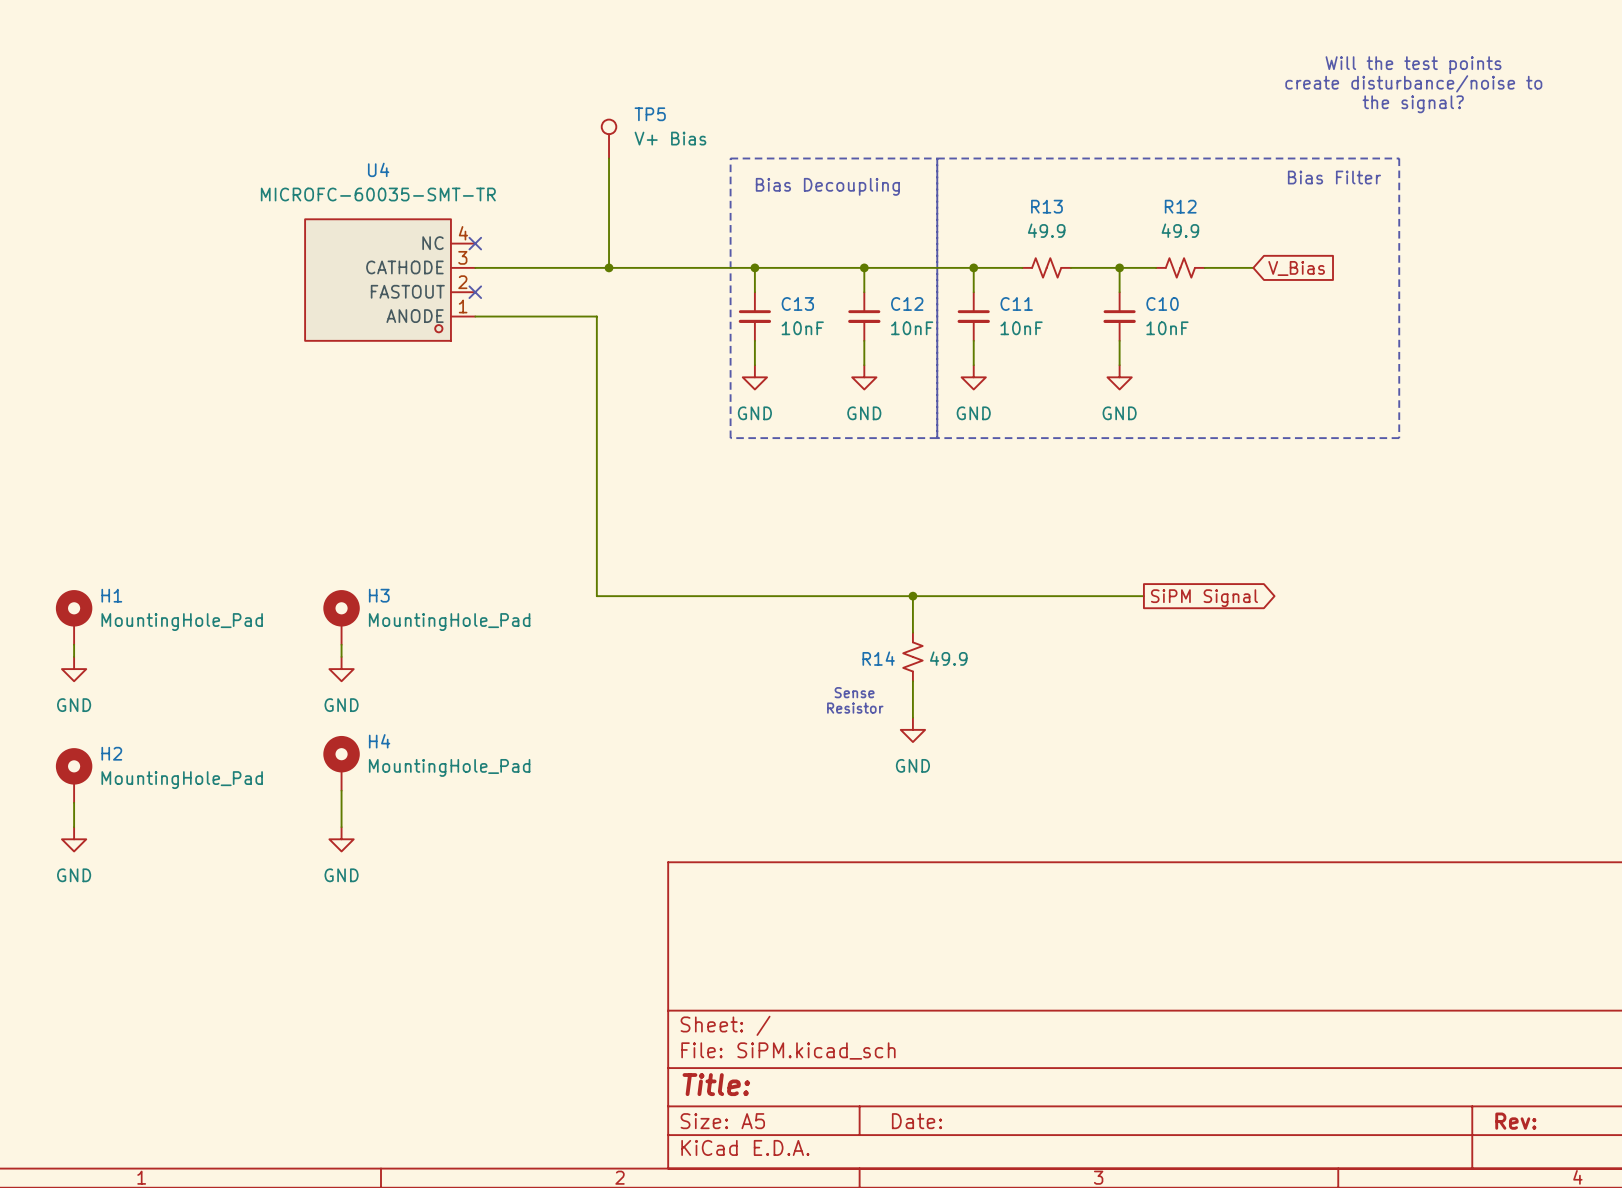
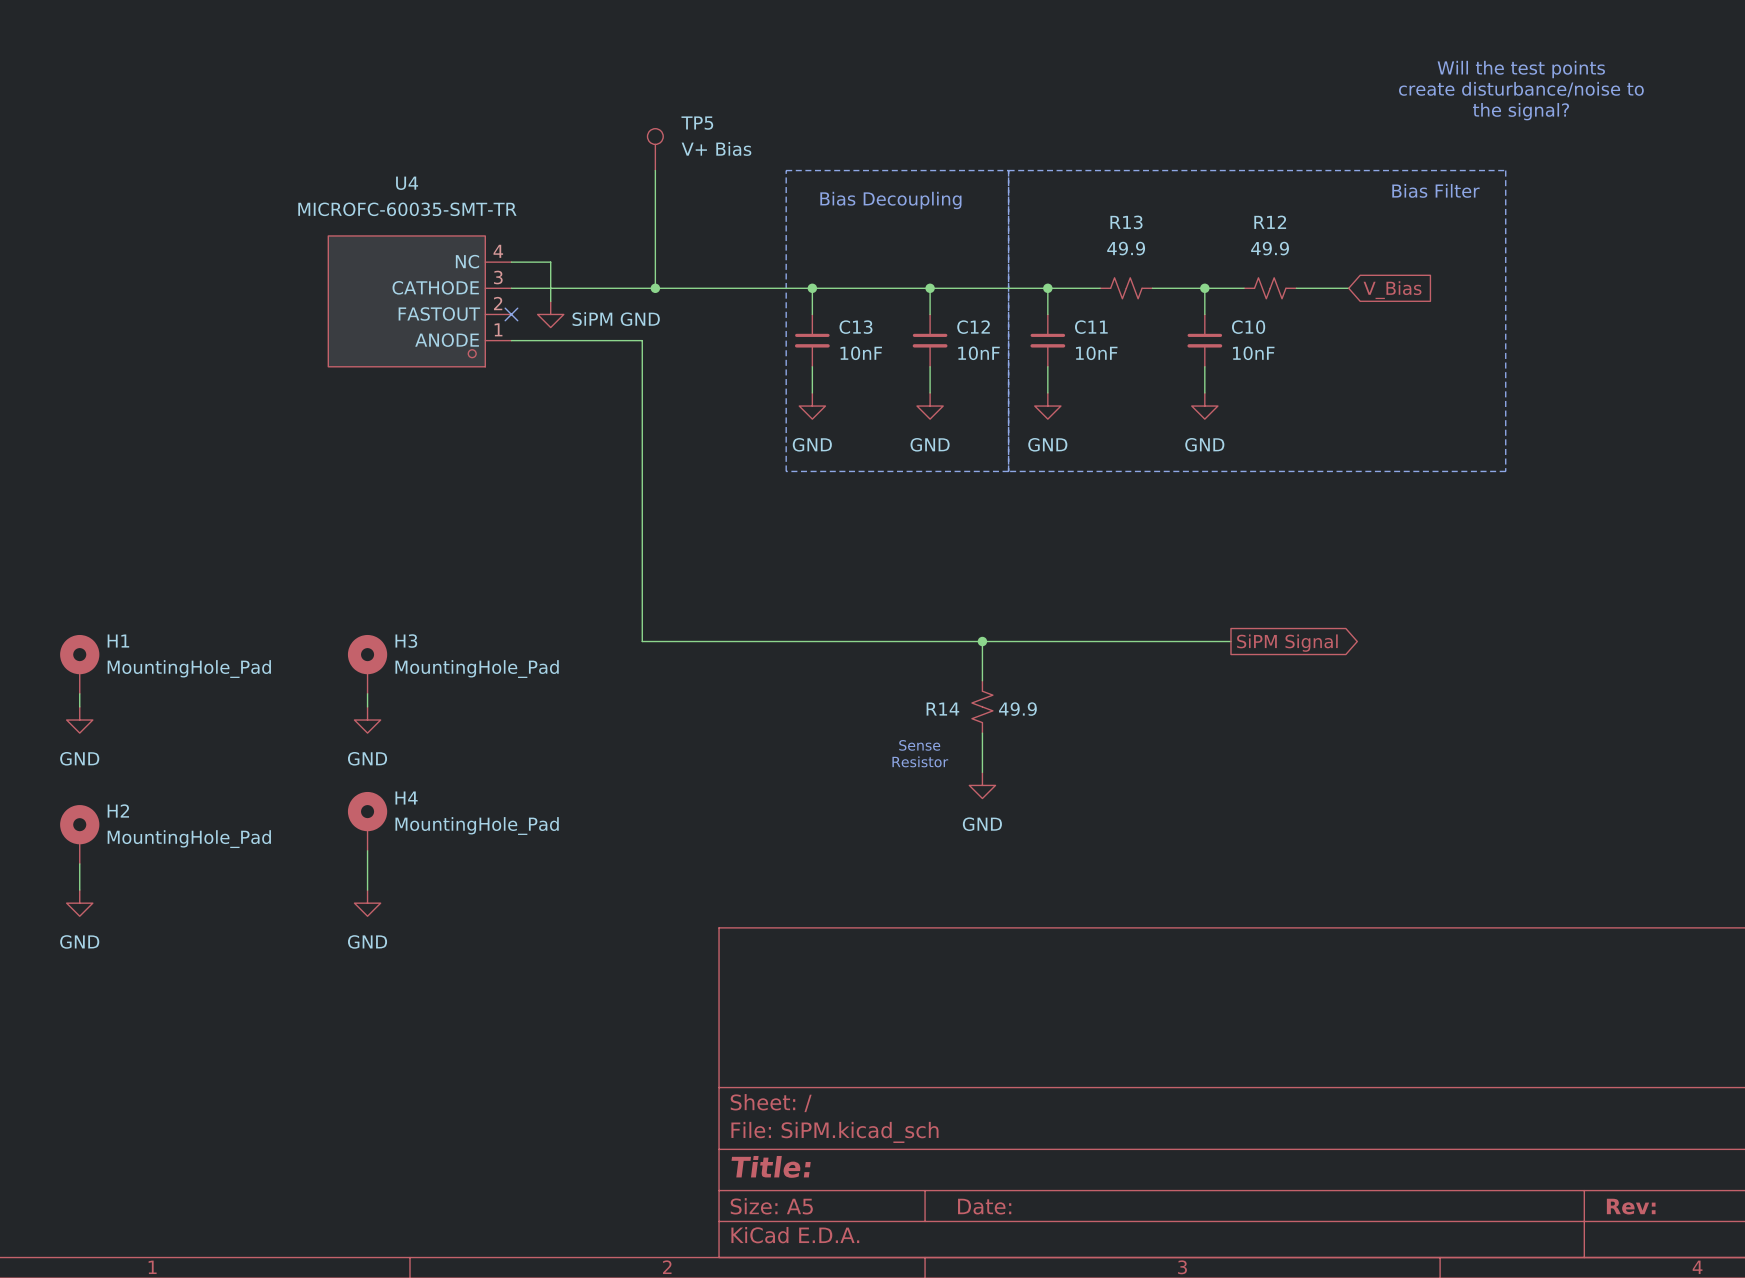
wire: none -> (511, 262) (550, 262) (550, 301)
no-connect mark: (475, 243) -> none
power symbol: none -> SiPM GND (550, 314)

